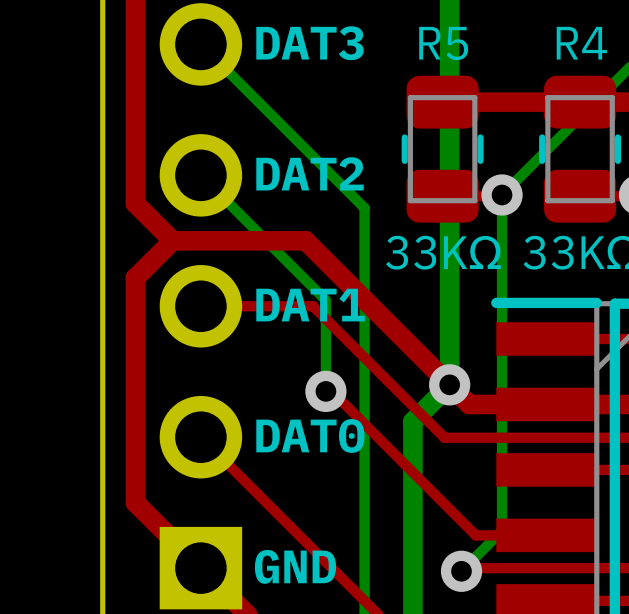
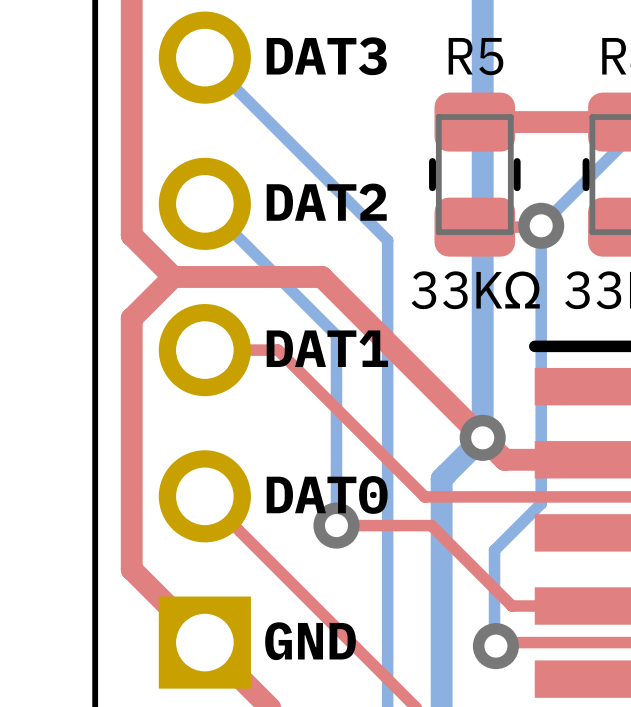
bottom track: (318, 293) (325, 300) (325, 391) -> (336, 335) (336, 525)
top track: (266, 306) (313, 306) (444, 437) -> (277, 350) (424, 496) (476, 496)
top track: (325, 391) (331, 391) (403, 463) -> (336, 525) (431, 525)
via position: (325, 391) -> (336, 525)
bottom track: (502, 443) (502, 530) (461, 571) -> (541, 503) (494, 550) (494, 642)

